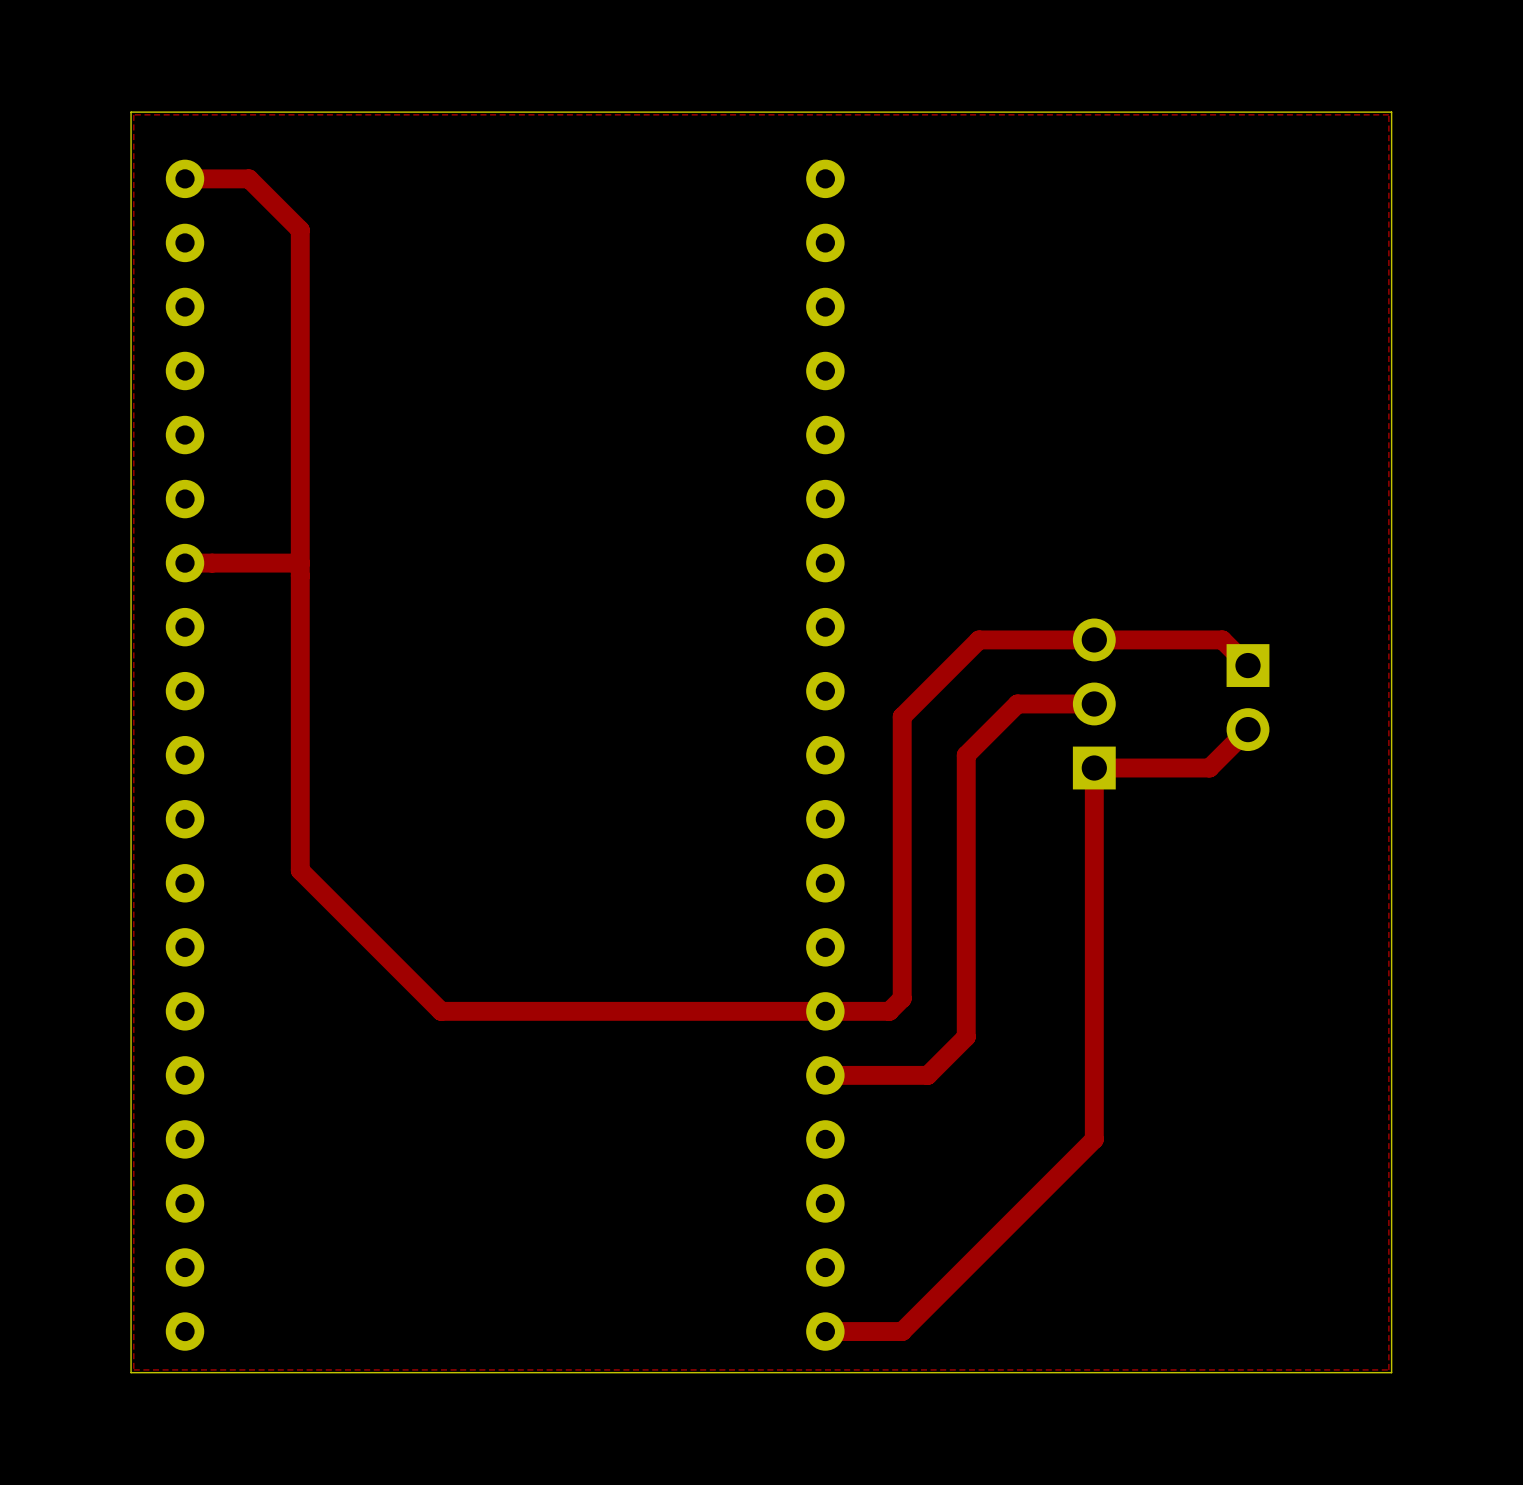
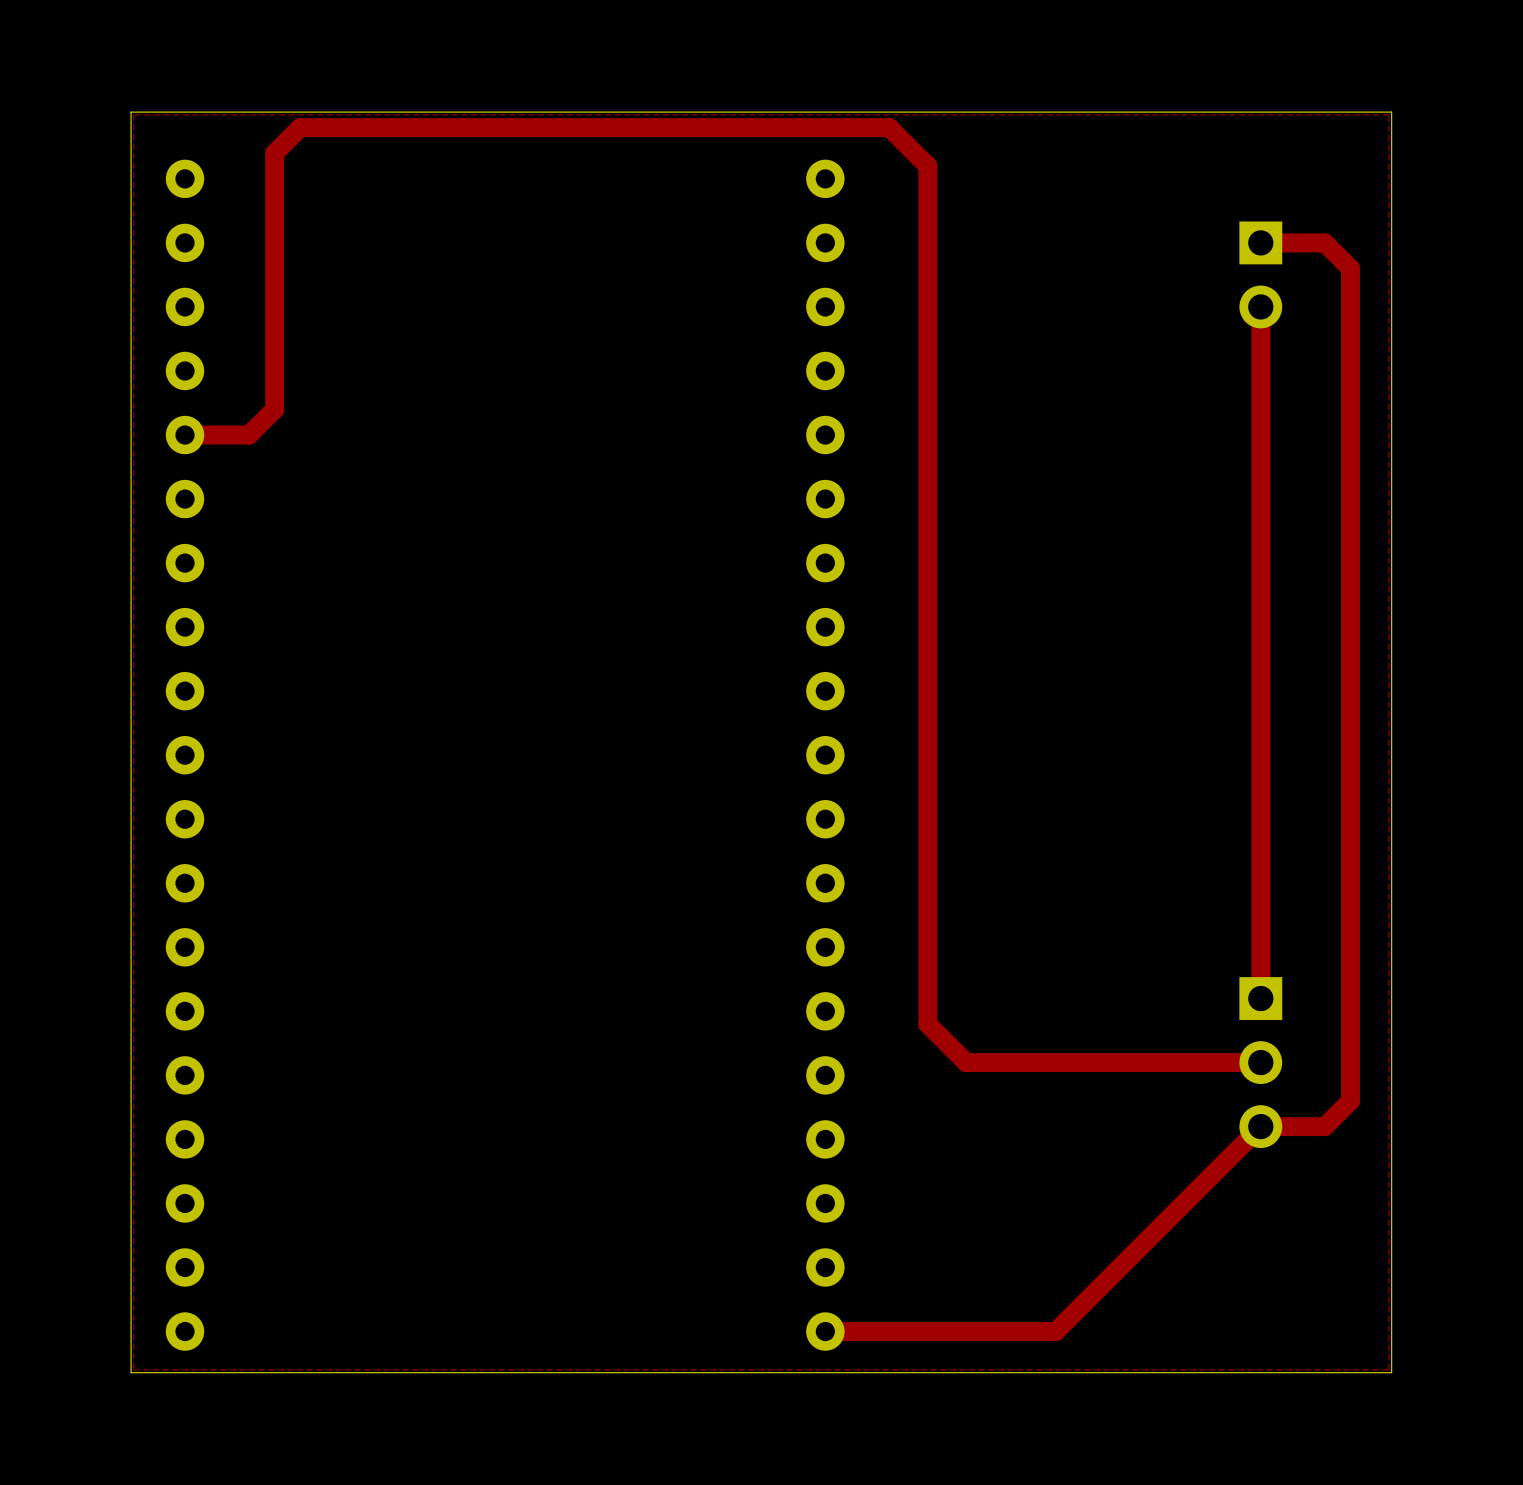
top track: (185, 178) (249, 178) (300, 230) (300, 870) (441, 1011) (889, 1011) (902, 998) (902, 716) (979, 639) (1222, 639) (1248, 665) -> none
top track: none -> (1260, 306) (1260, 998)
top track: none -> (185, 435) (249, 435) (274, 409) (274, 153) (300, 127) (889, 127) (927, 166) (927, 1024) (966, 1062) (1260, 1062)
top track: (300, 563) (185, 563) -> none
part position: (1248, 697) -> (1260, 274)
top track: (1094, 703) (1017, 703) (966, 755) (966, 1036) (927, 1075) (825, 1075) -> none
part rotation: 0° (1094, 703) -> 180° (1260, 1062)
part position: (1094, 703) -> (1260, 1062)
top track: (1248, 729) (1209, 768) (1094, 768) (1094, 1139) (902, 1331) -> (1260, 242) (1324, 242) (1350, 268) (1350, 1101) (1324, 1126) (1260, 1126) (1055, 1331) (902, 1331)

